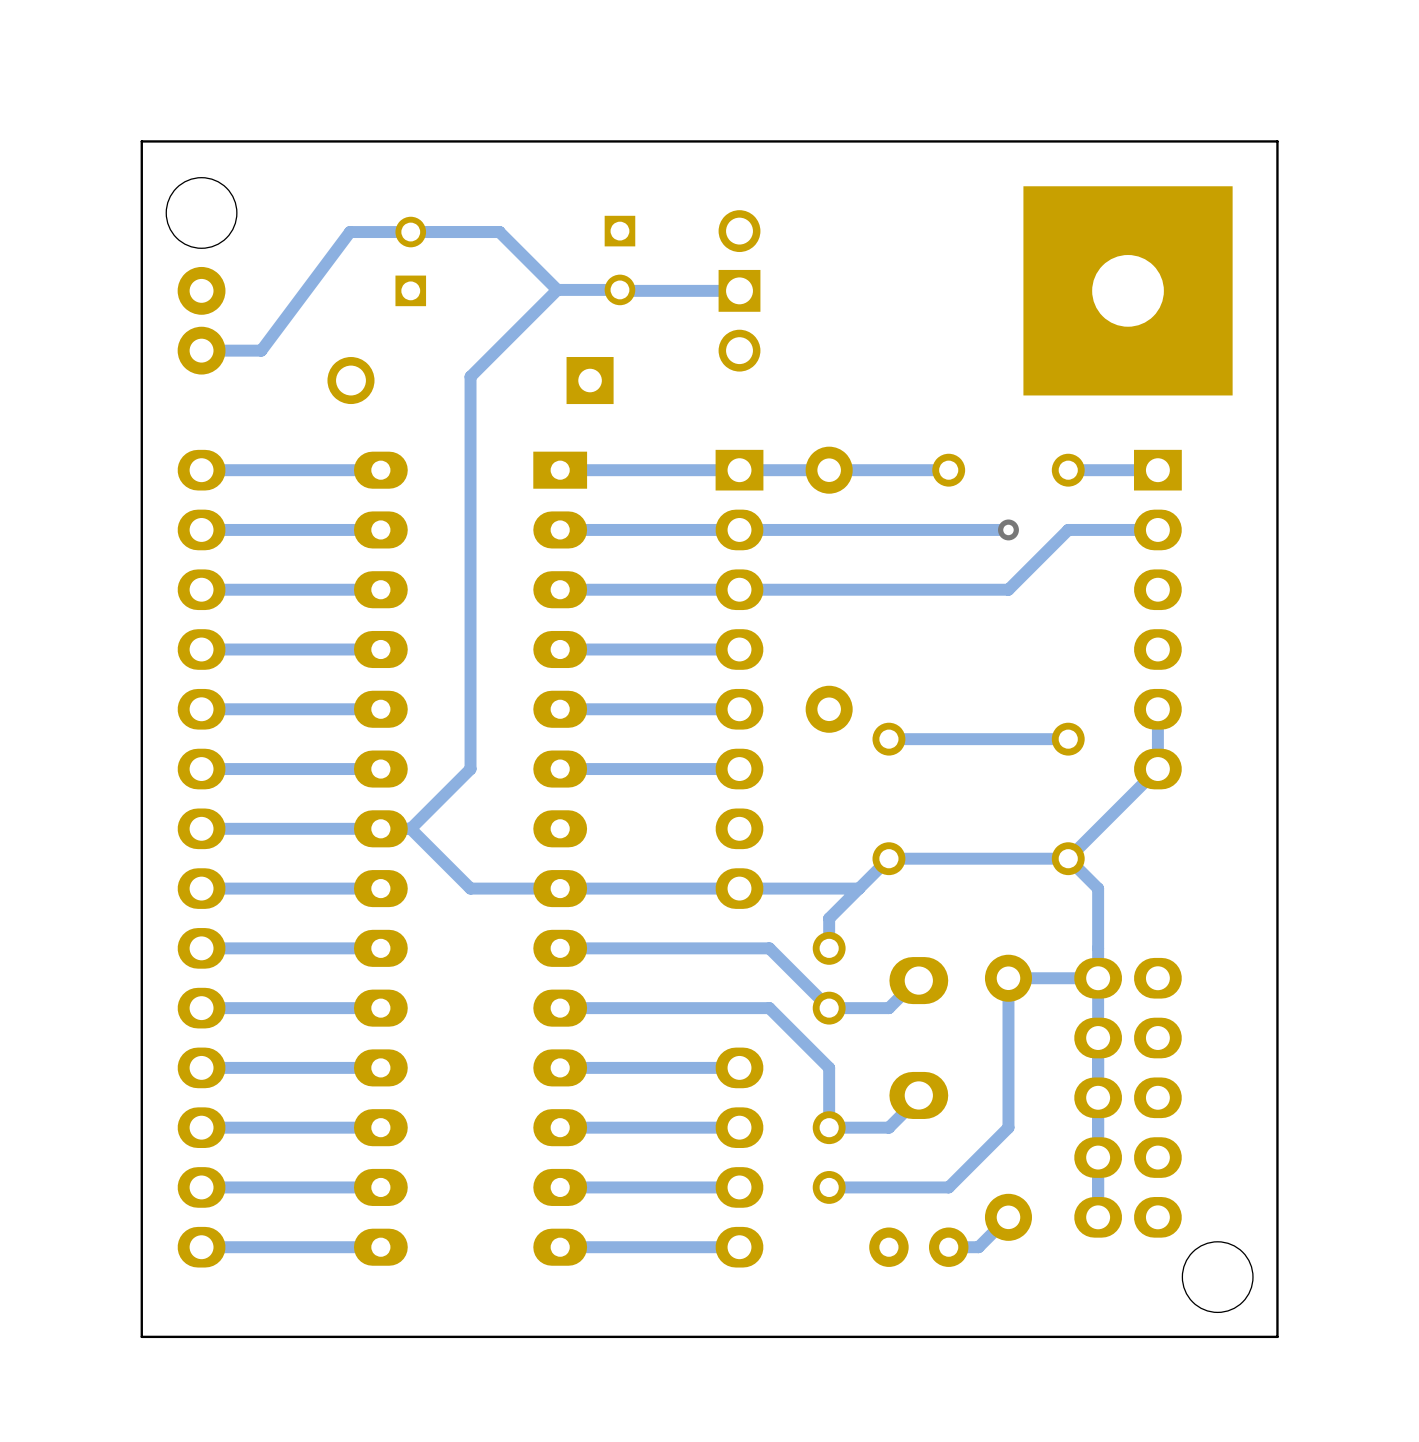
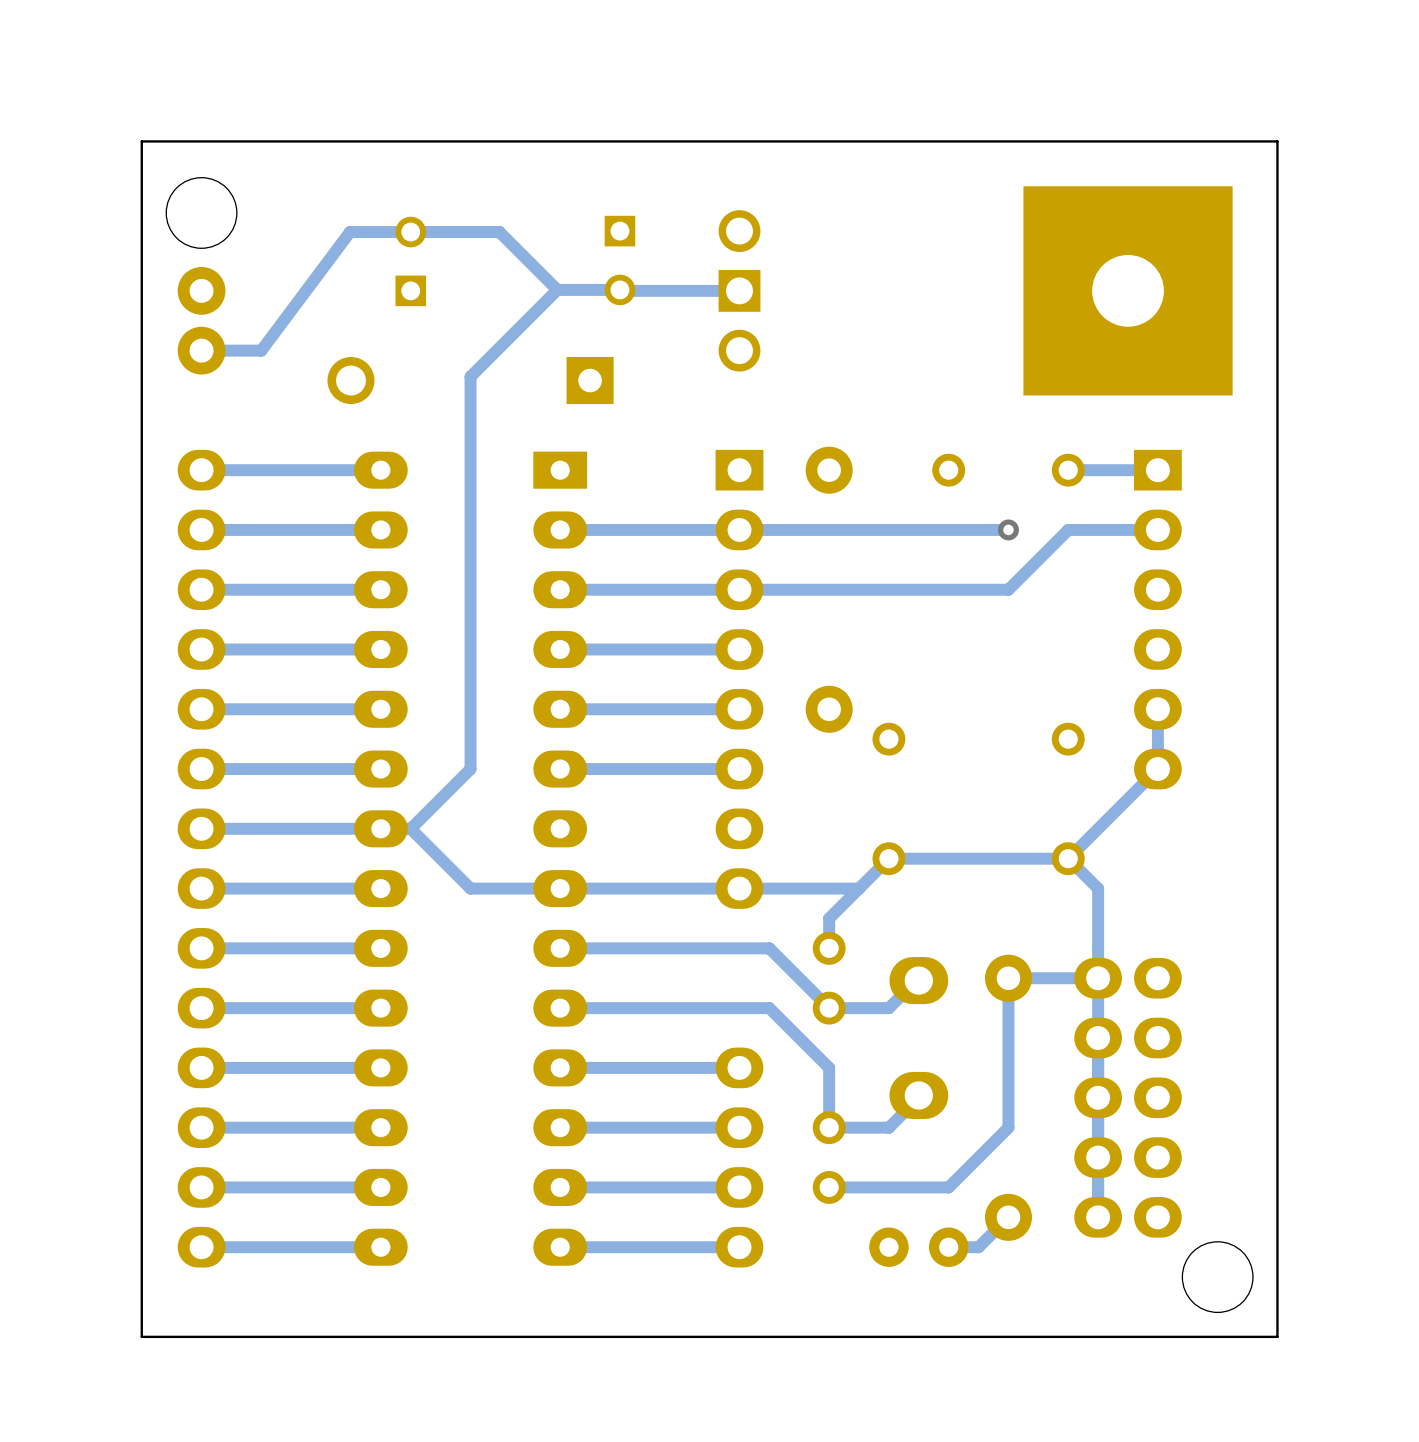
track: (948, 470) (560, 470) -> none
track: (1068, 739) (888, 739) -> none

